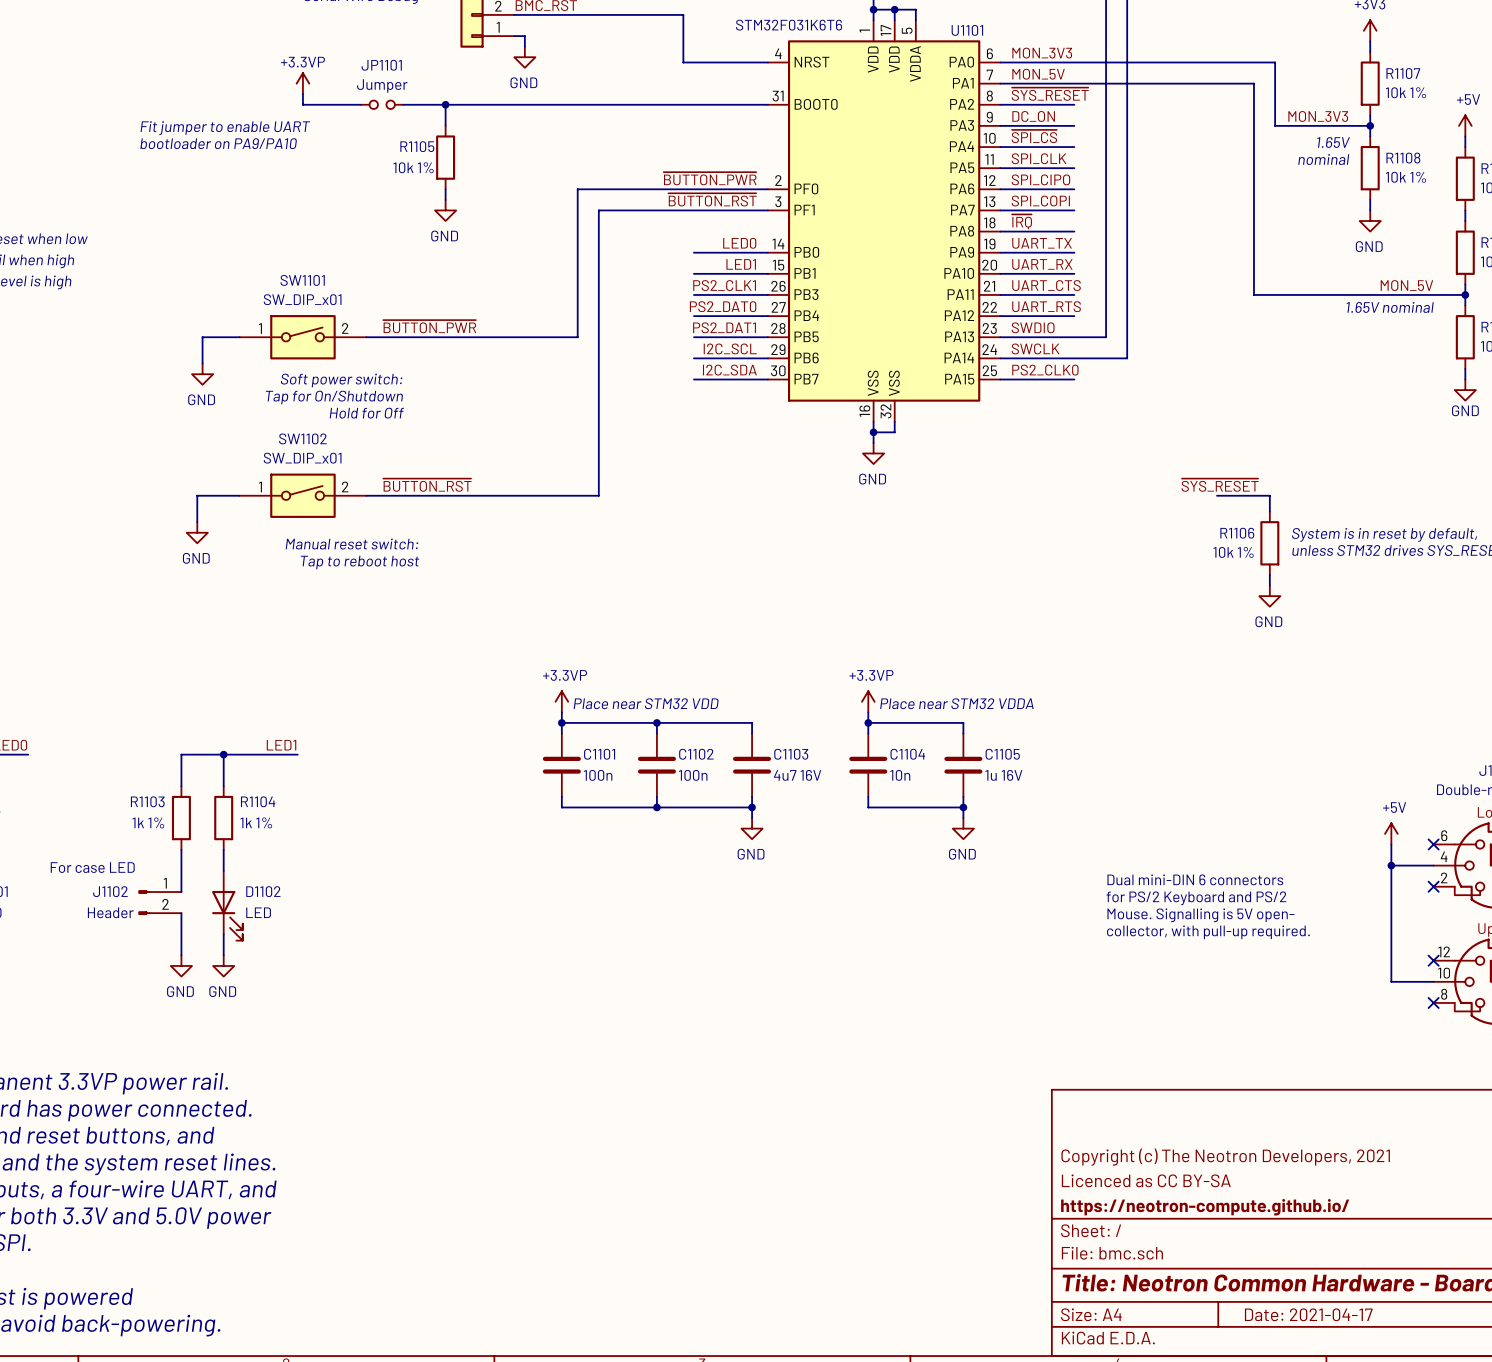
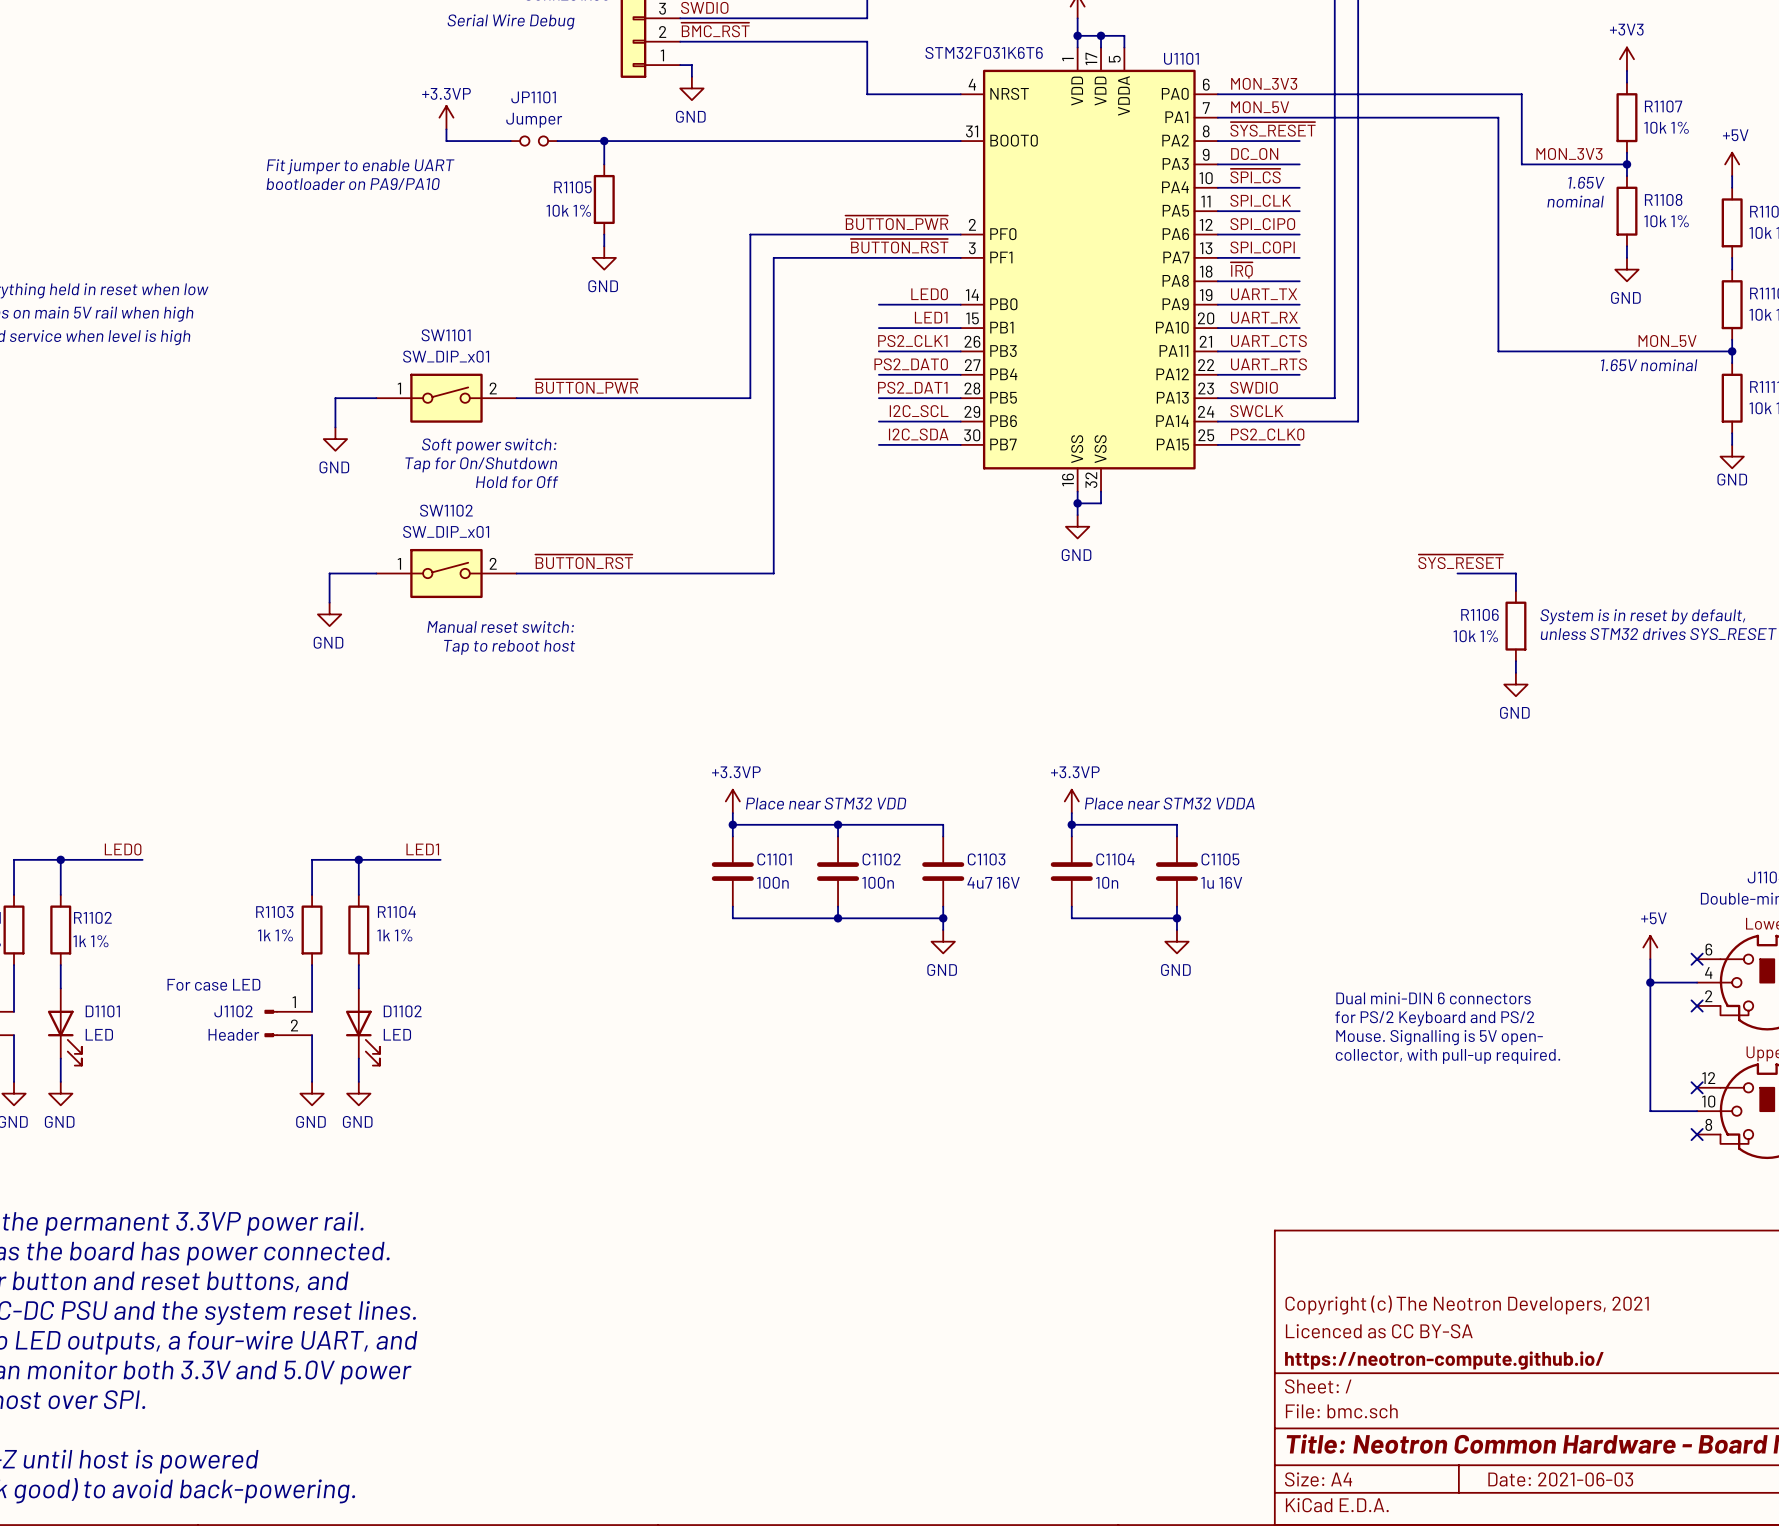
title block: Date: 2021-04-17 (1308, 1314) -> Date: 2021-06-03 (1560, 1479)

